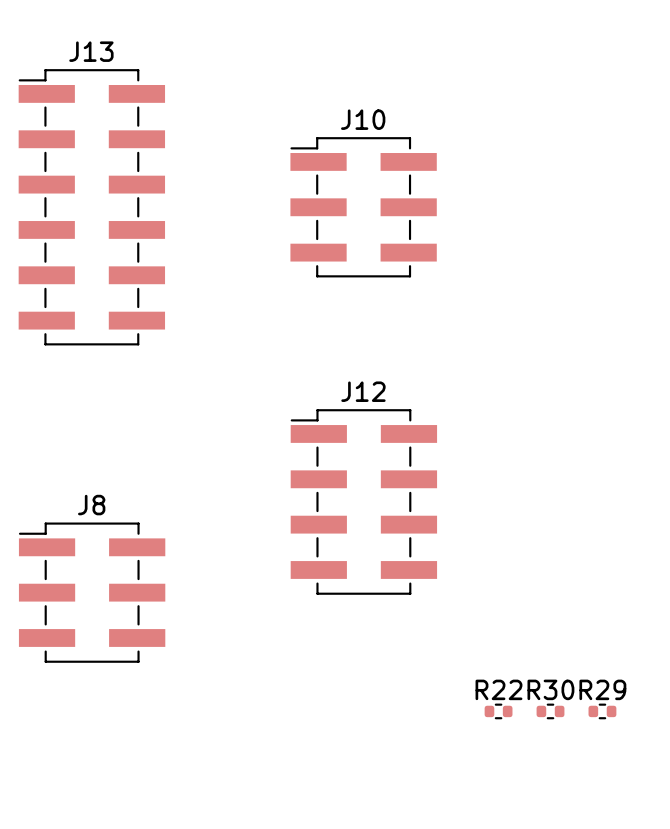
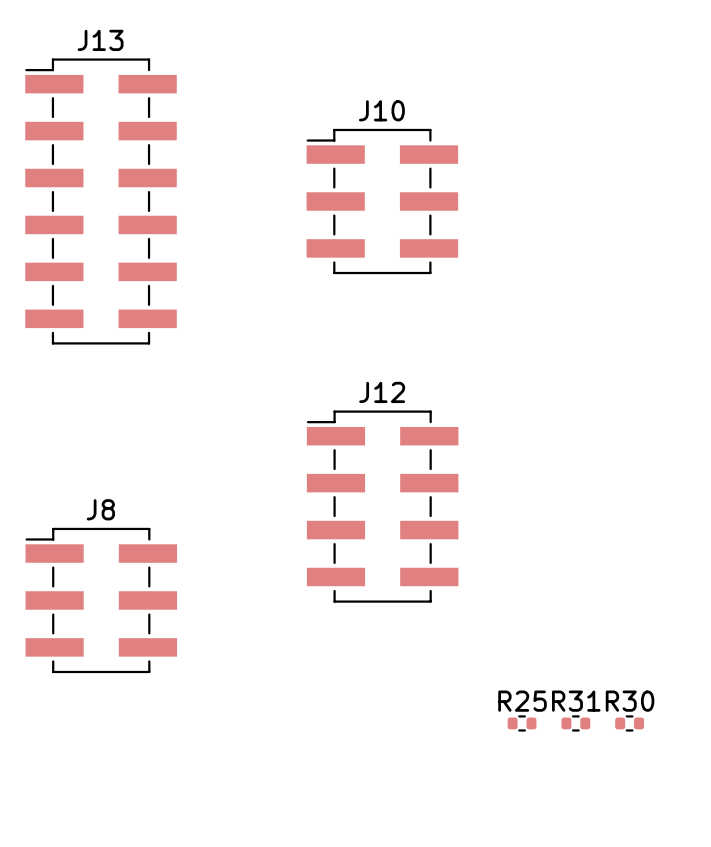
R22 name: R22 (498, 689) -> R25 (522, 701)
R30 name: R30 (550, 689) -> R31 (576, 701)
R29 name: R29 (602, 689) -> R30 (630, 701)

